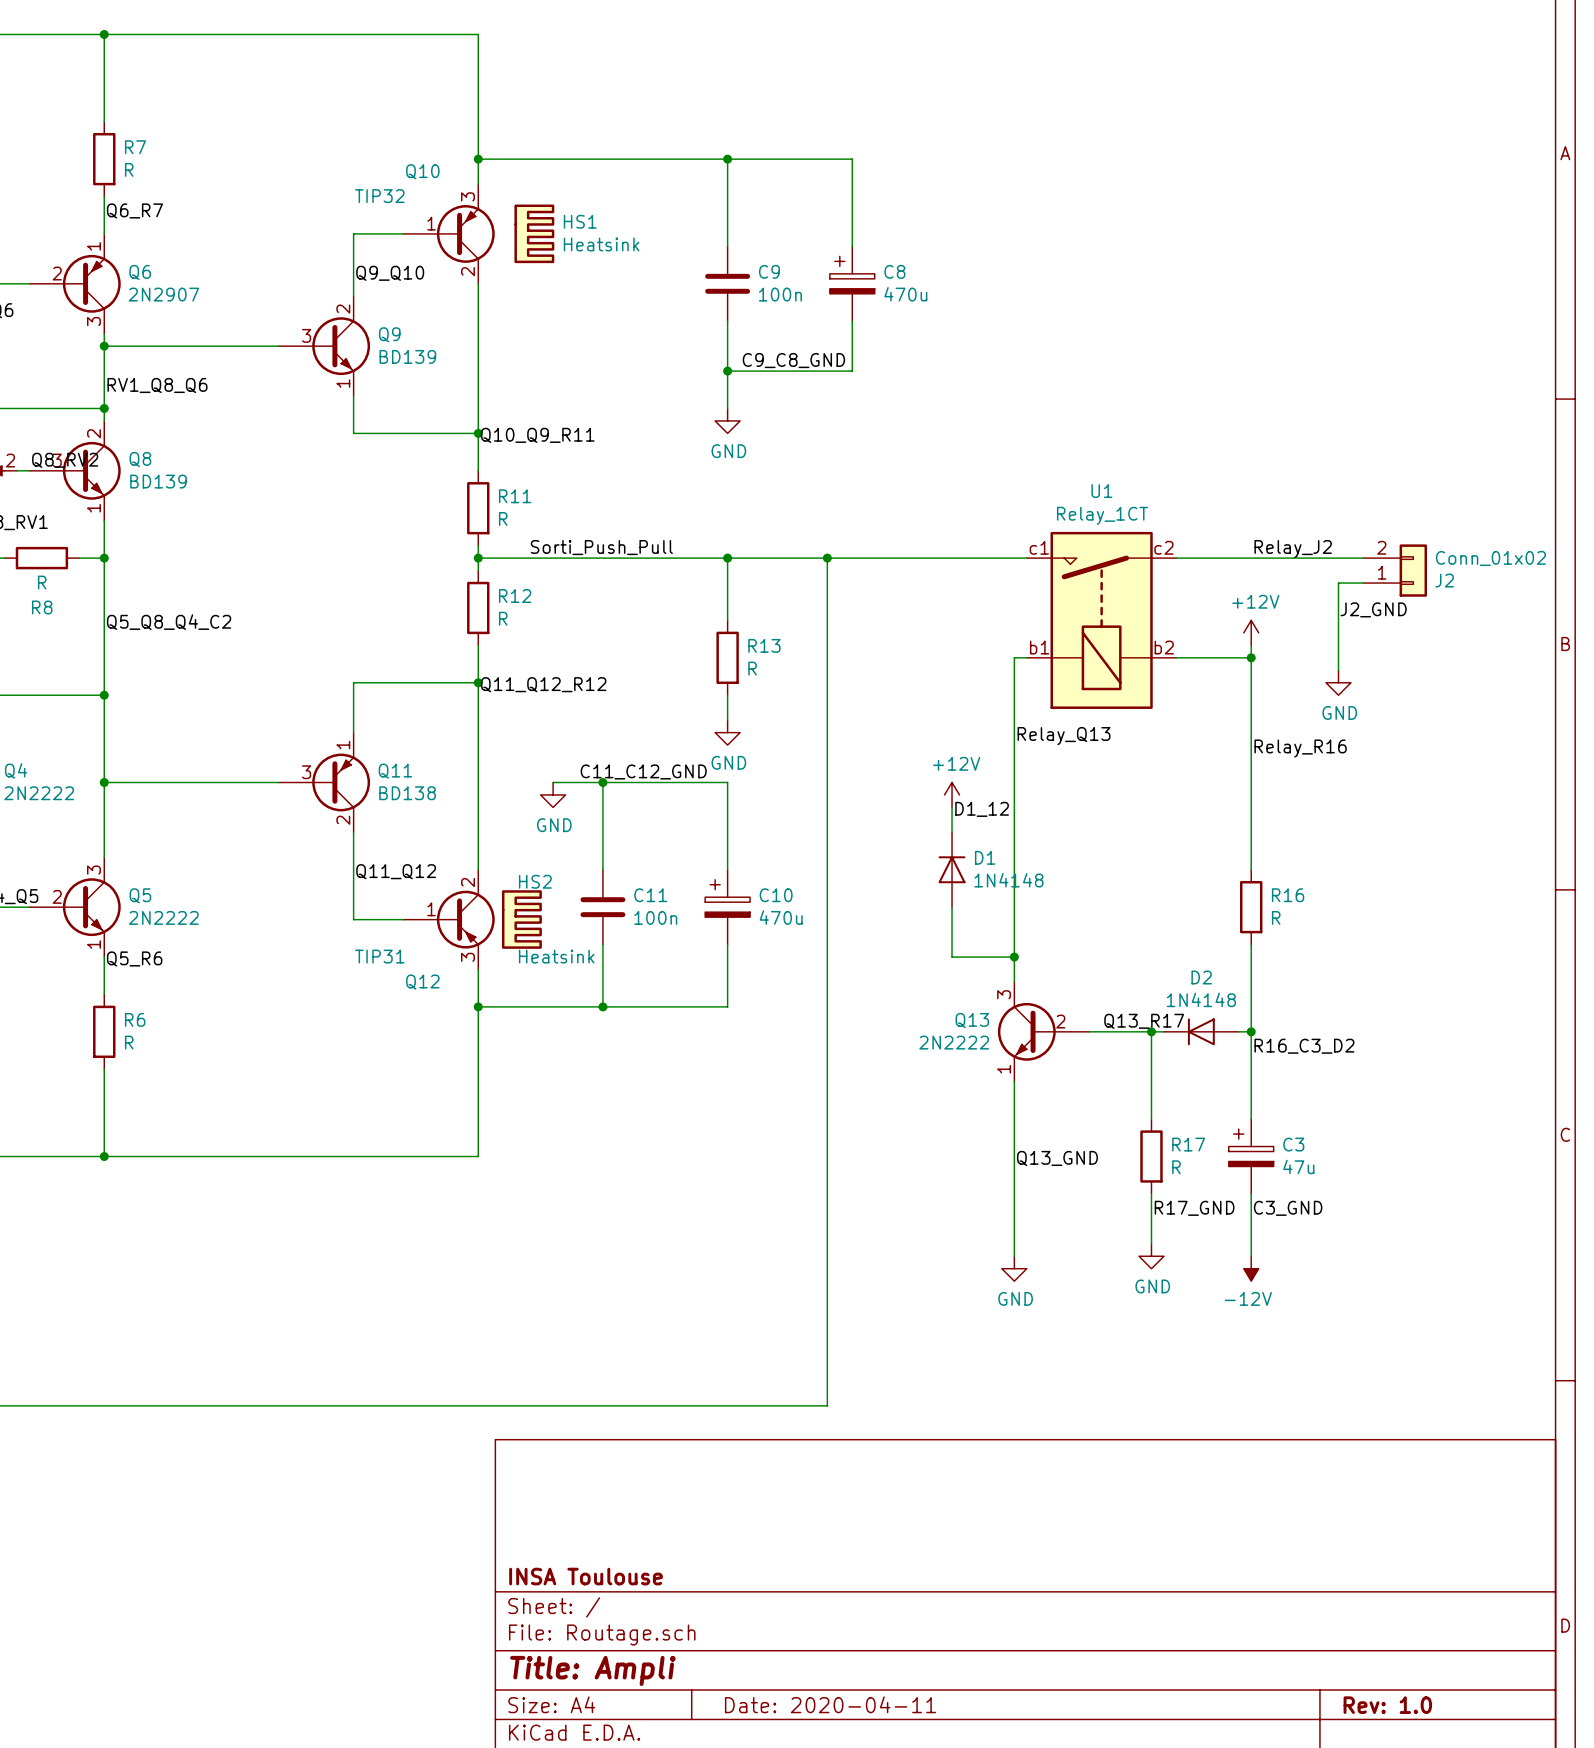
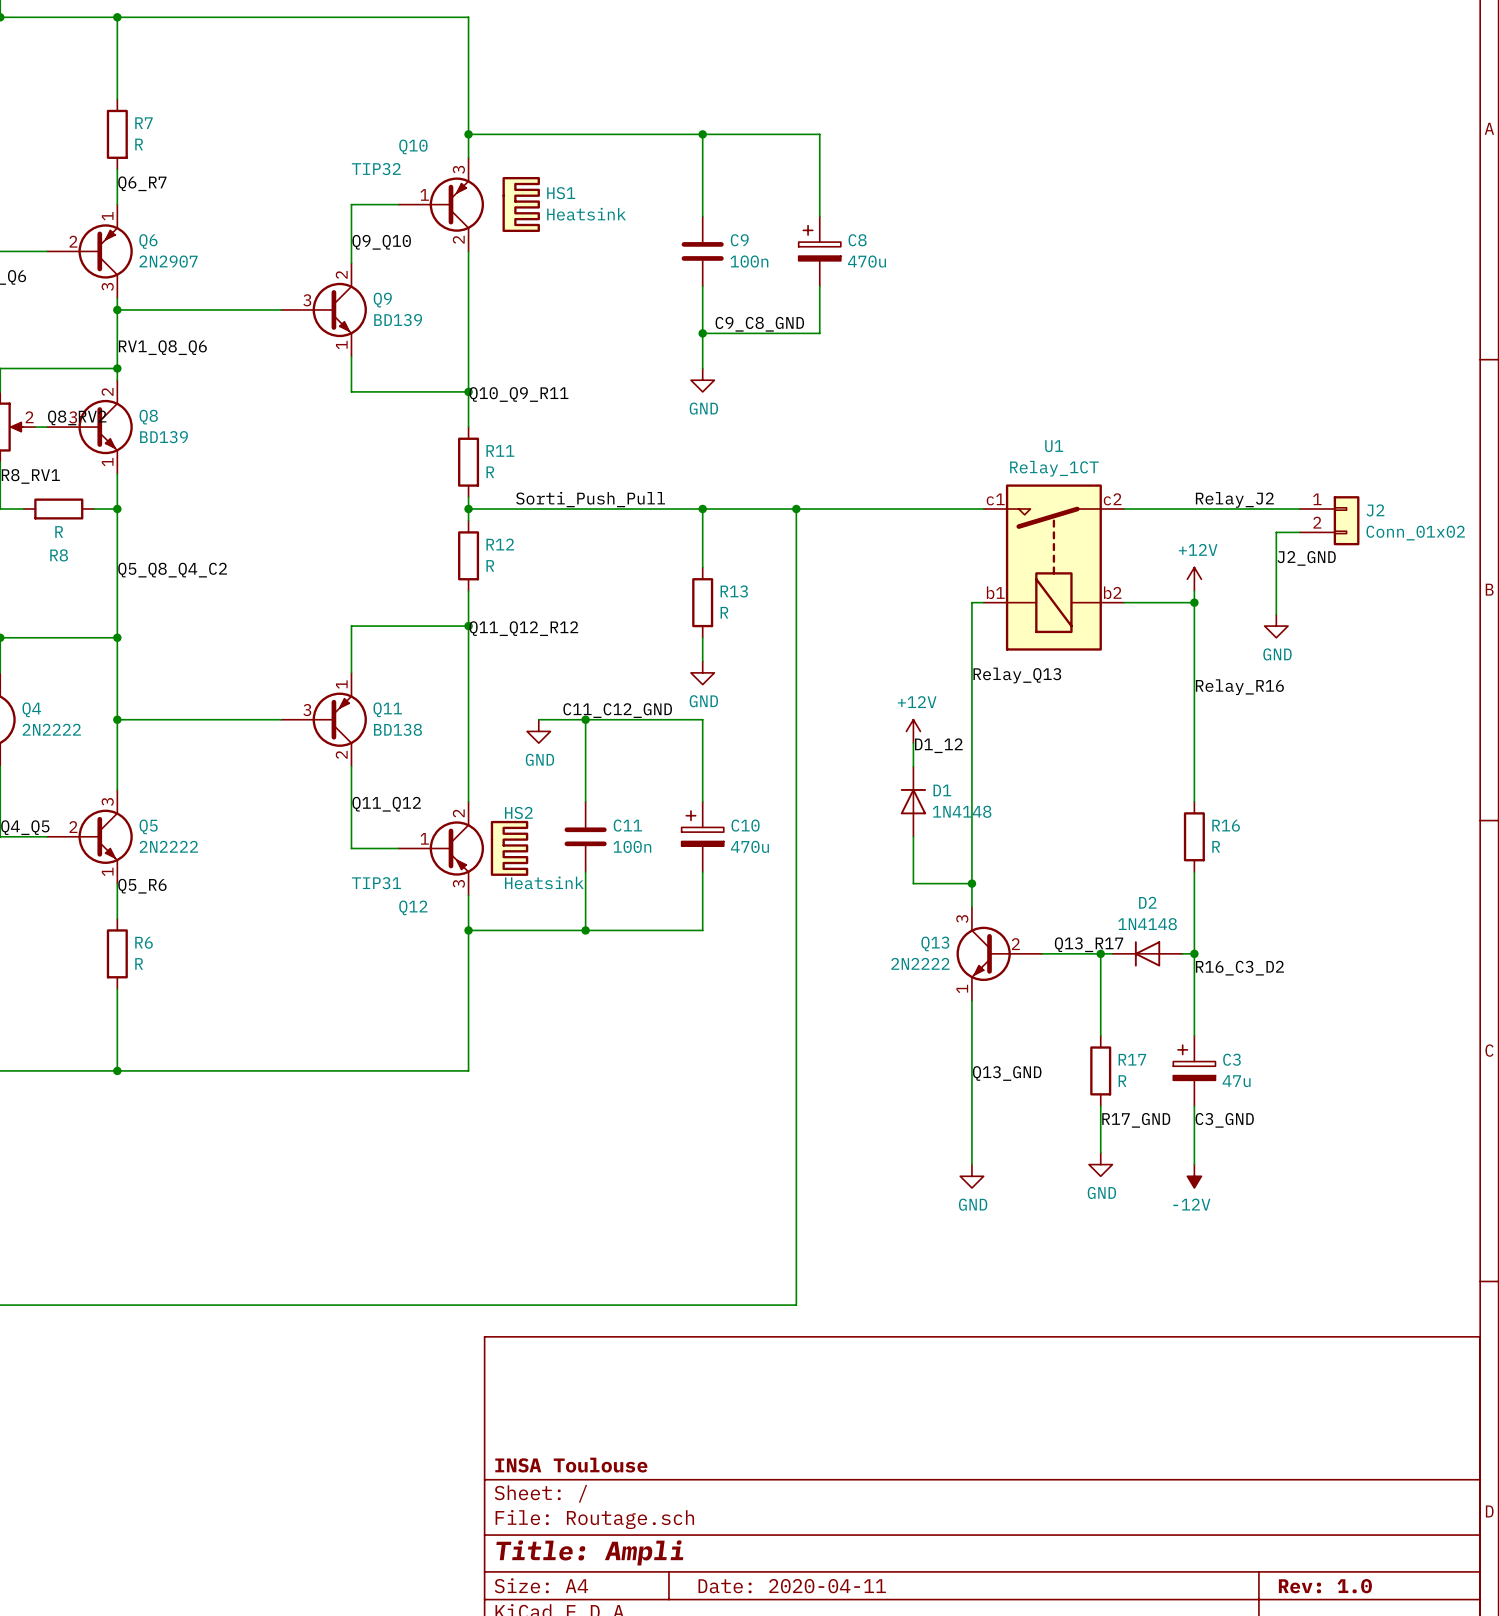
J2 flip: as is (1413, 570) -> up-down (1346, 520)

